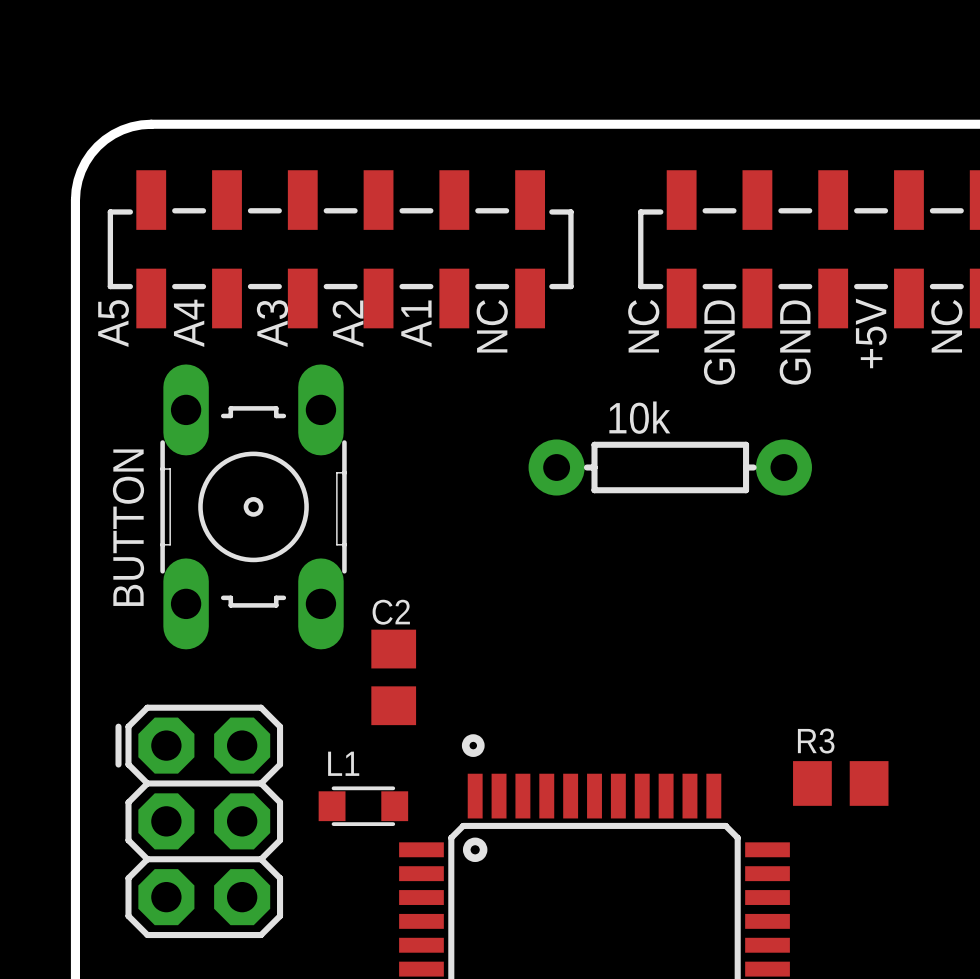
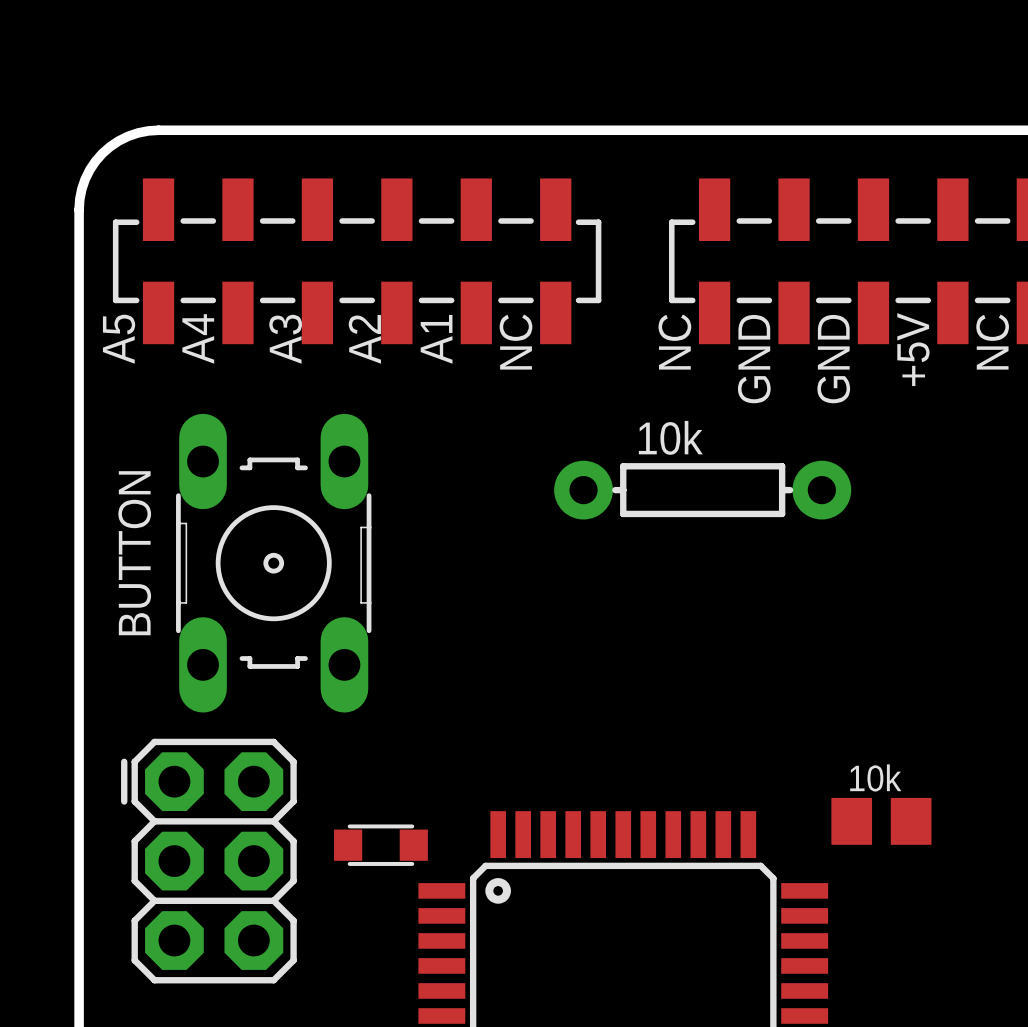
part position: (253, 506) -> (273, 563)
text: C2 (391, 612) -> none
part: (393, 677) -> none
drawing: [461, 734, 485, 757] -> none
text: R3 (816, 741) -> none
part value: none -> 10k (875, 777)
text: L1 (343, 763) -> none

